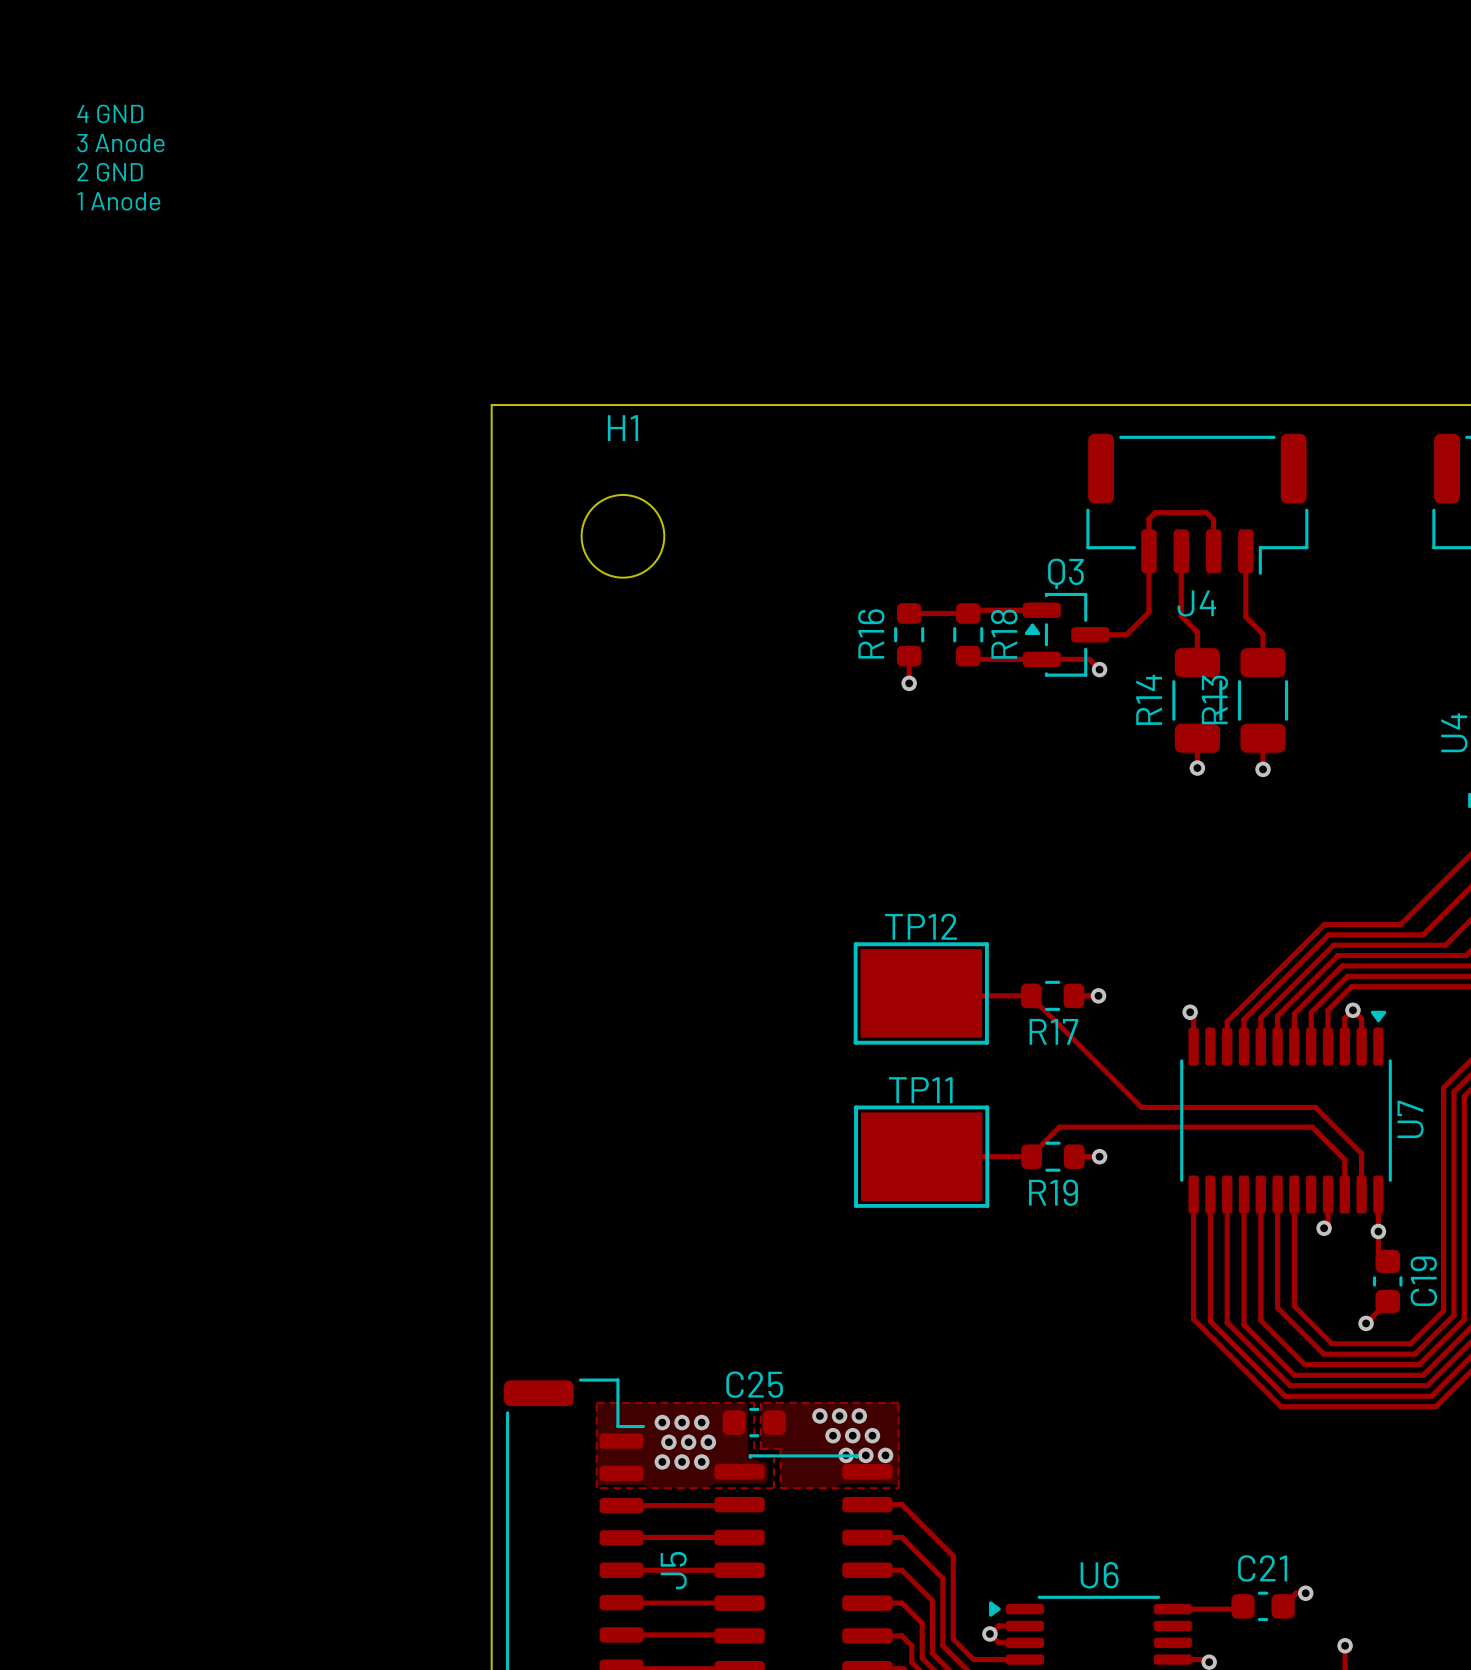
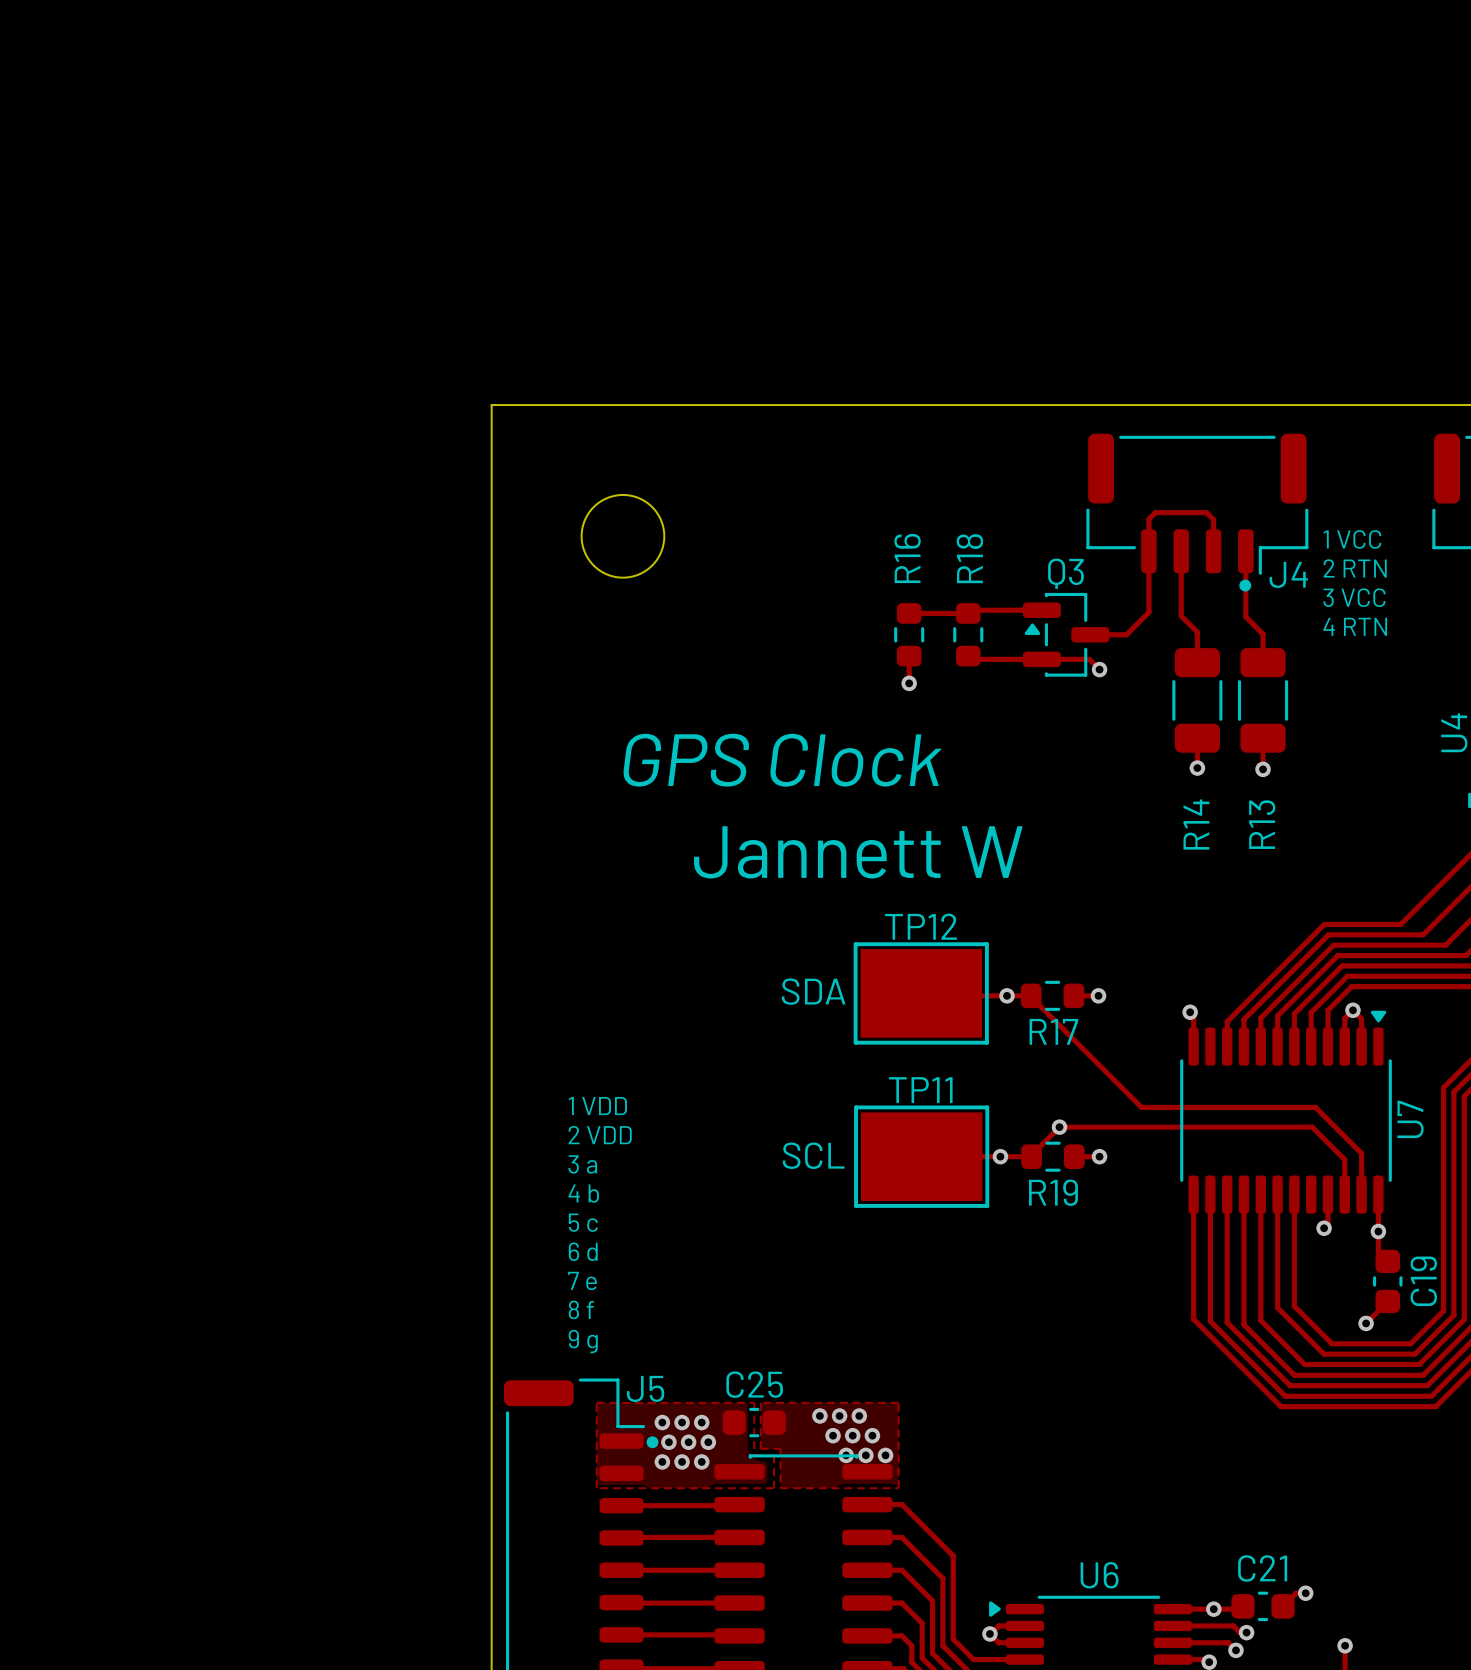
text: 4 GND (110, 113) -> none
text: 3 Anode (120, 143) -> none
text: 2 GND (110, 172) -> none
text: 1 Anode (118, 201) -> none
H1 name: H1 (622, 428) -> none
text: none -> 1 VCC (1352, 539)
text: none -> 2 RTN (1355, 568)
drawing: none -> [1239, 579, 1252, 592]
text: none -> 3 VCC (1354, 597)
J4 name position: J4 (1196, 603) -> J4 (1288, 574)
text: none -> 4 RTN (1355, 626)
R16 name position: R16 (871, 633) -> R16 (907, 558)
R18 name position: R18 (1004, 634) -> R18 (969, 558)
R14 name position: R14 (1149, 699) -> R14 (1196, 824)
R13 name position: R13 (1214, 699) -> R13 (1262, 824)
text: none -> GPS Clock (782, 760)
text: none -> Jannett W (858, 852)
text: none -> SDA (813, 991)
via: none -> (1007, 995)
text: none -> 1 VDD (597, 1106)
via: none -> (1059, 1127)
text: none -> 2 VDD (600, 1135)
text: none -> SCL (813, 1155)
via: none -> (1000, 1156)
text: none -> 3 a (582, 1164)
text: none -> 4 b (583, 1193)
text: none -> 5 c (583, 1222)
text: none -> 6 d (583, 1251)
text: none -> 7 e (582, 1280)
text: none -> 8 f (581, 1309)
text: none -> 9 g (583, 1341)
drawing: none -> [646, 1436, 659, 1449]
J5 name rotation: 0° (673, 1570) -> 90° clockwise (645, 1388)
J5 name position: J5 (673, 1570) -> J5 (645, 1388)
via: none -> (1213, 1609)
track: none -> (1172, 1625) (1233, 1625) (1240, 1632) (1246, 1632)
via: none -> (1246, 1632)
track: none -> (1172, 1642) (1228, 1642) (1235, 1650)
via: none -> (1235, 1650)

